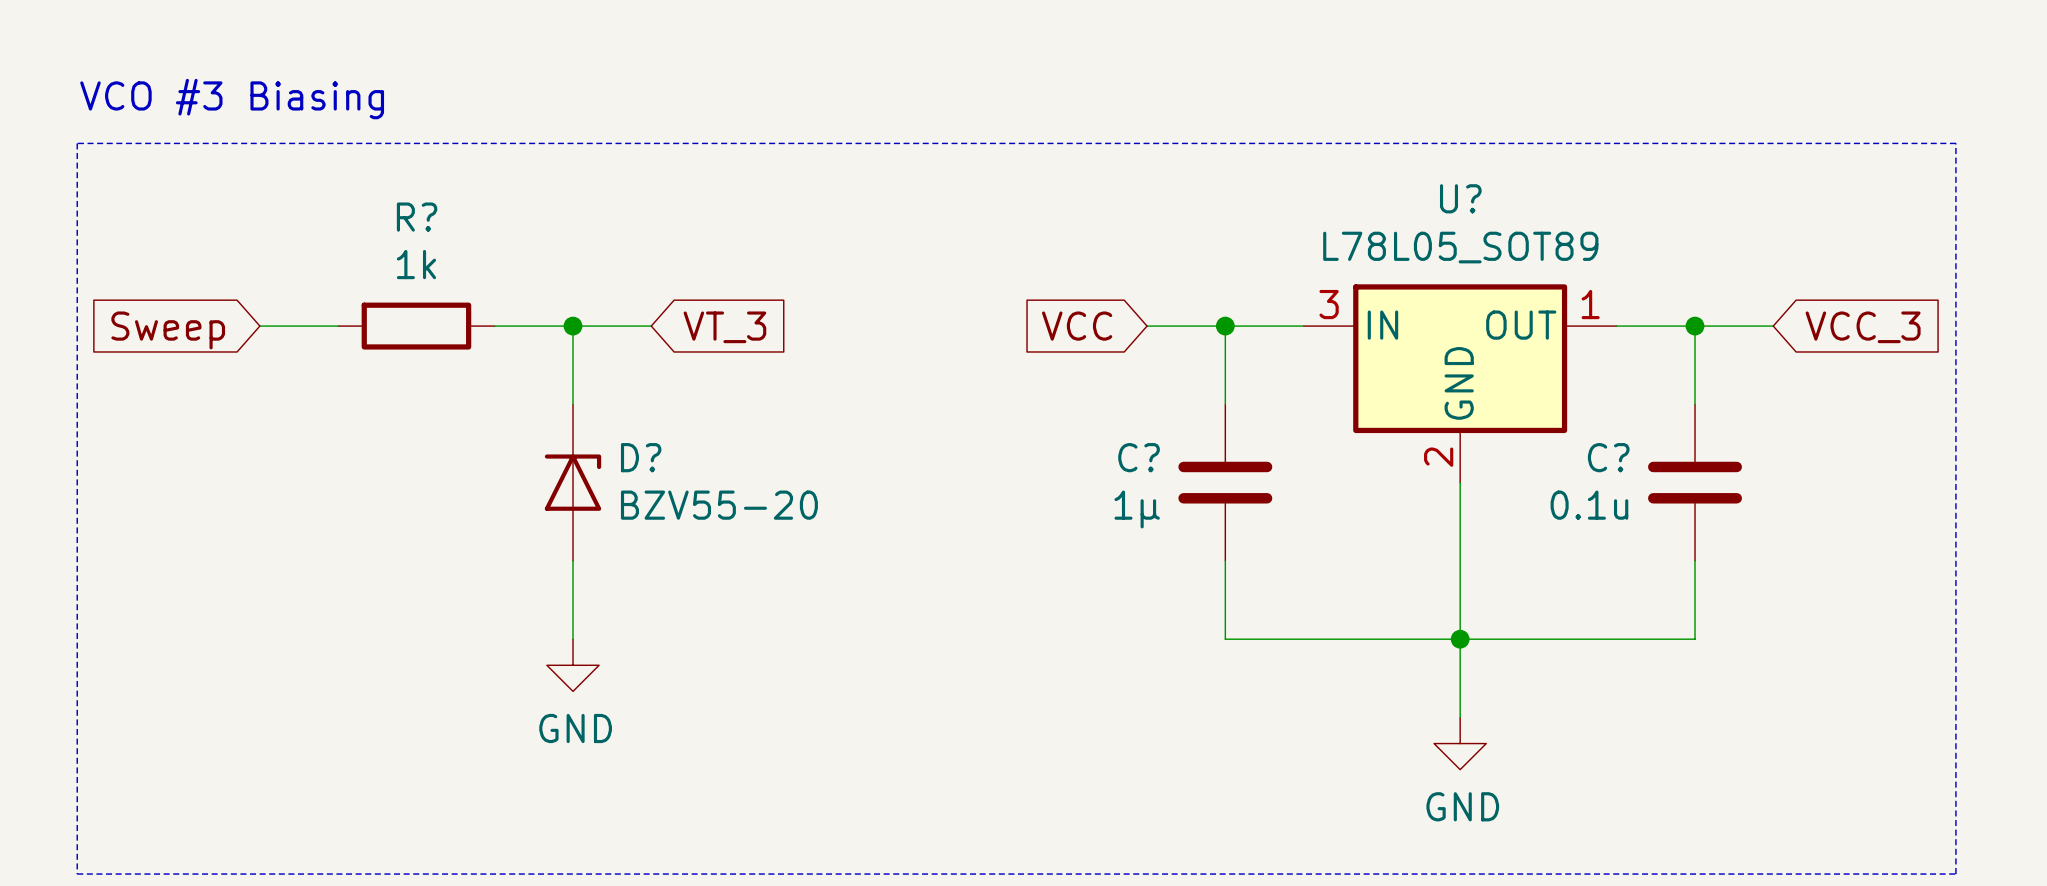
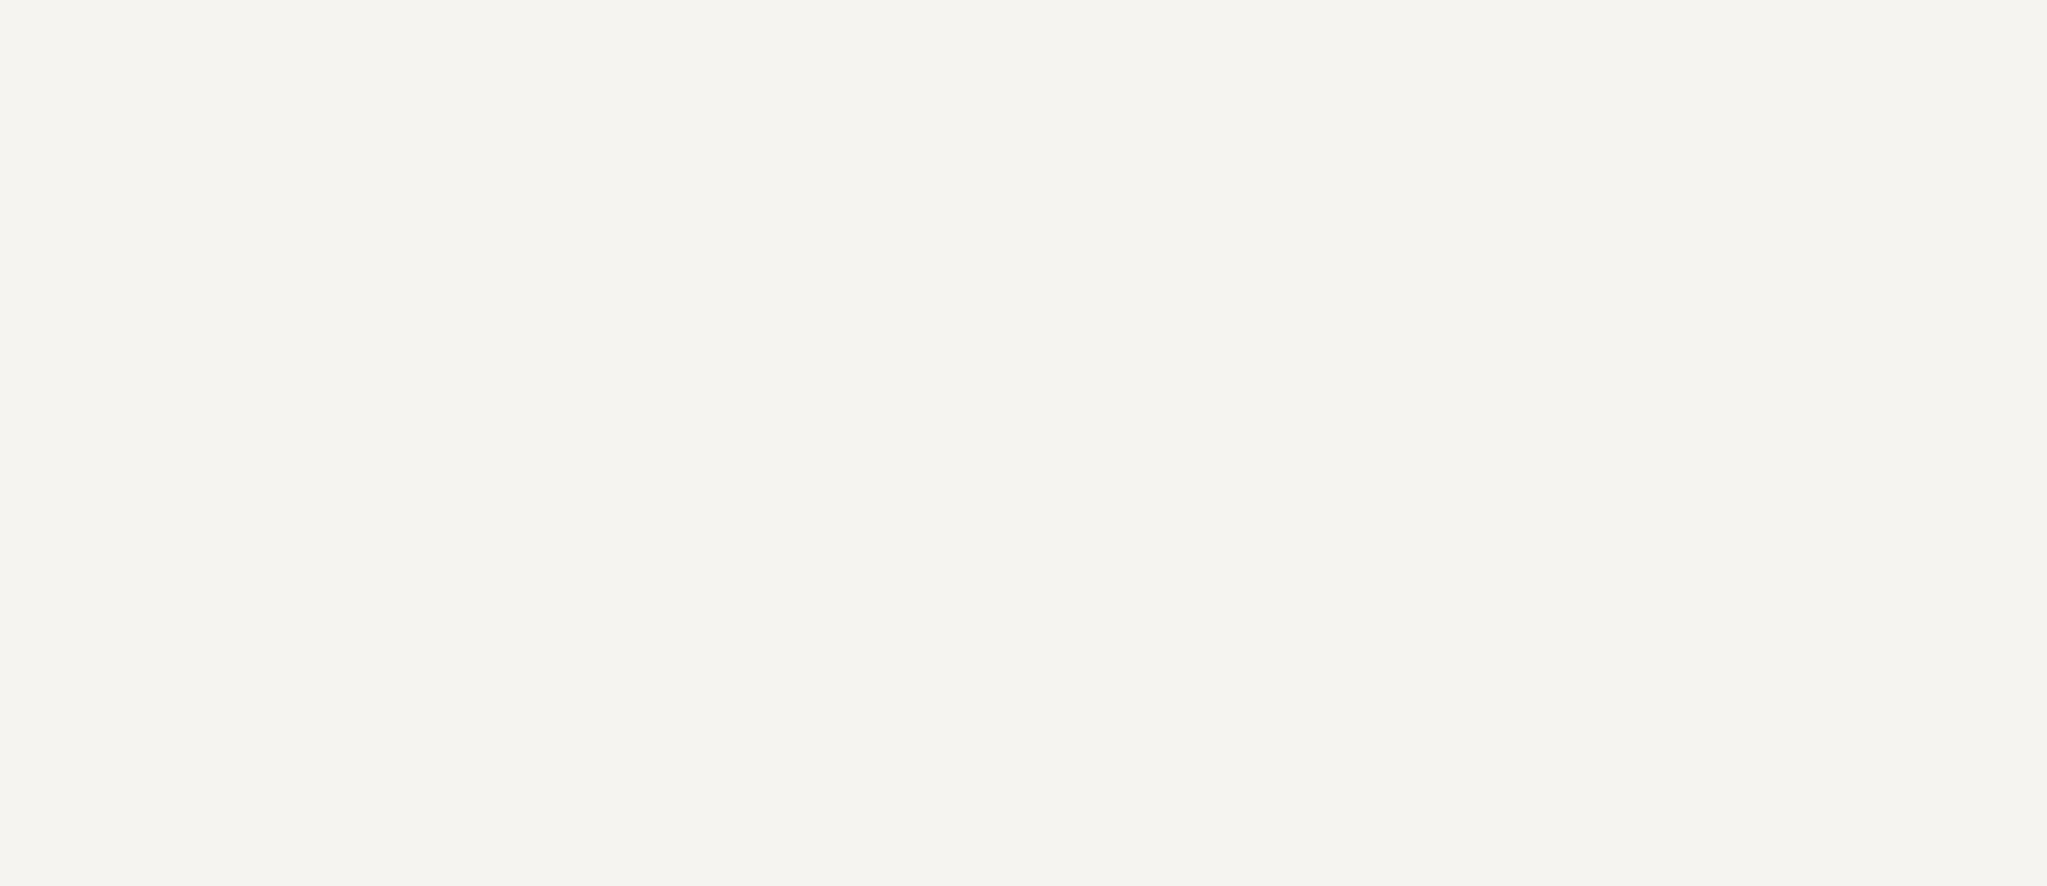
text: VCO #3 Biasing (232, 99) -> none
line: (77, 143) (1955, 143) (1955, 874) (77, 874) (77, 143) -> none
wire: (259, 326) (338, 326) -> none
R?: 1k (416, 326) -> none
wire: (494, 326) (651, 326) -> none
wire: (573, 326) (573, 404) -> none
junction: (573, 326) -> none
global label: VCC (1077, 326) -> none
wire: (1147, 326) (1303, 326) -> none
wire: (1225, 326) (1225, 404) -> none
junction: (1225, 326) -> none
wire: (1616, 326) (1773, 326) -> none
wire: (1695, 326) (1695, 404) -> none
junction: (1695, 326) -> none
global label: VT_3 (724, 327) -> none
global label: VCC_3 (1863, 327) -> none
global label: Sweep (168, 330) -> none
U?: L78L05_SOT89 (1460, 383) -> none
D?: BZV55-20 (573, 482) -> none
C?: 1μ (1225, 482) -> none
wire: (1460, 482) (1460, 717) -> none
C?: 0.1u (1695, 482) -> none
wire: (573, 560) (573, 639) -> none
wire: (1225, 560) (1225, 639) (1695, 639) (1695, 560) -> none
junction: (1460, 639) -> none
power symbol: GND (573, 665) -> none
power symbol: GND (1460, 743) -> none

